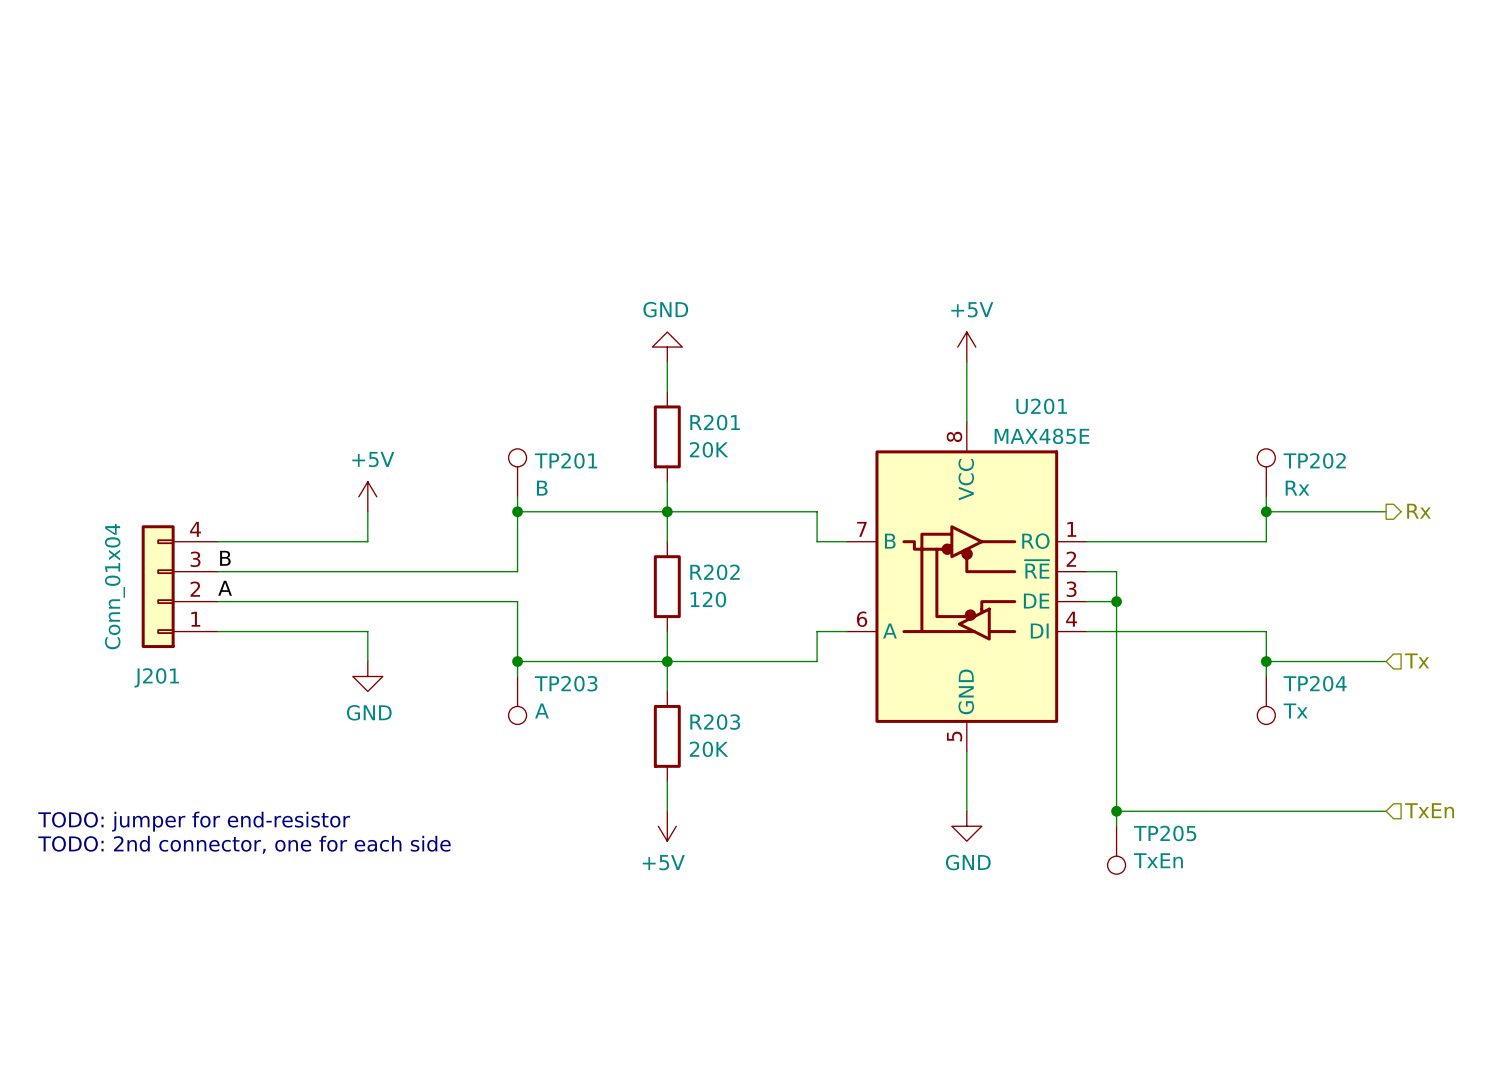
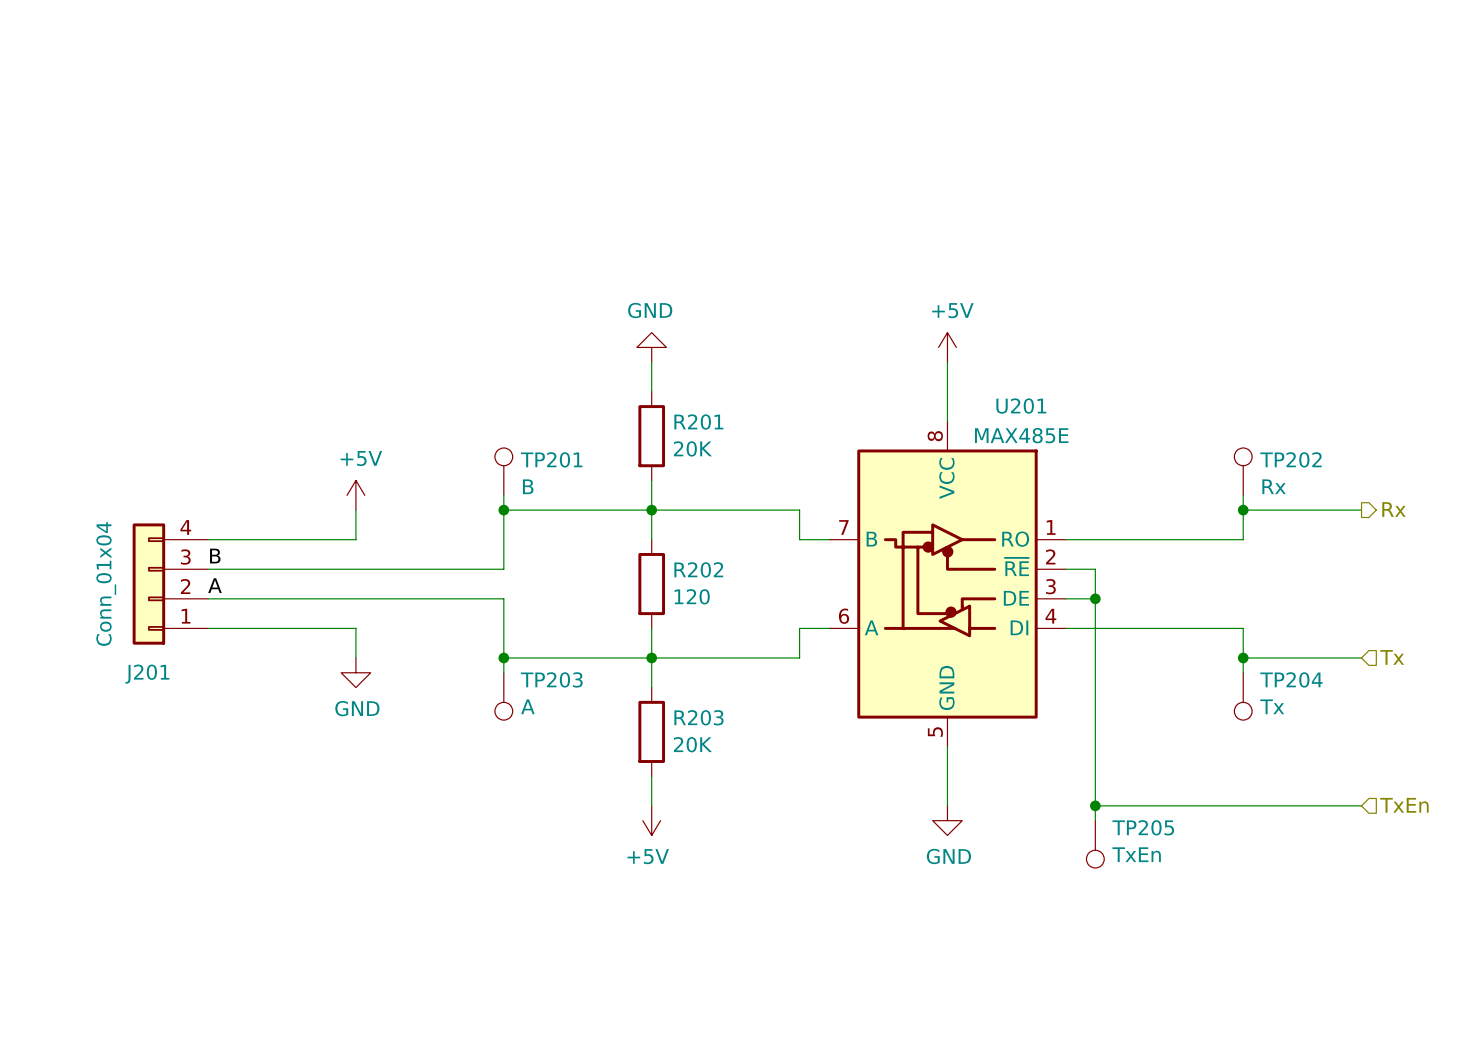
text: TODO: jumper for end-resistor (194, 821) -> none
text: TODO: 2nd connector, one for each side (244, 844) -> none

